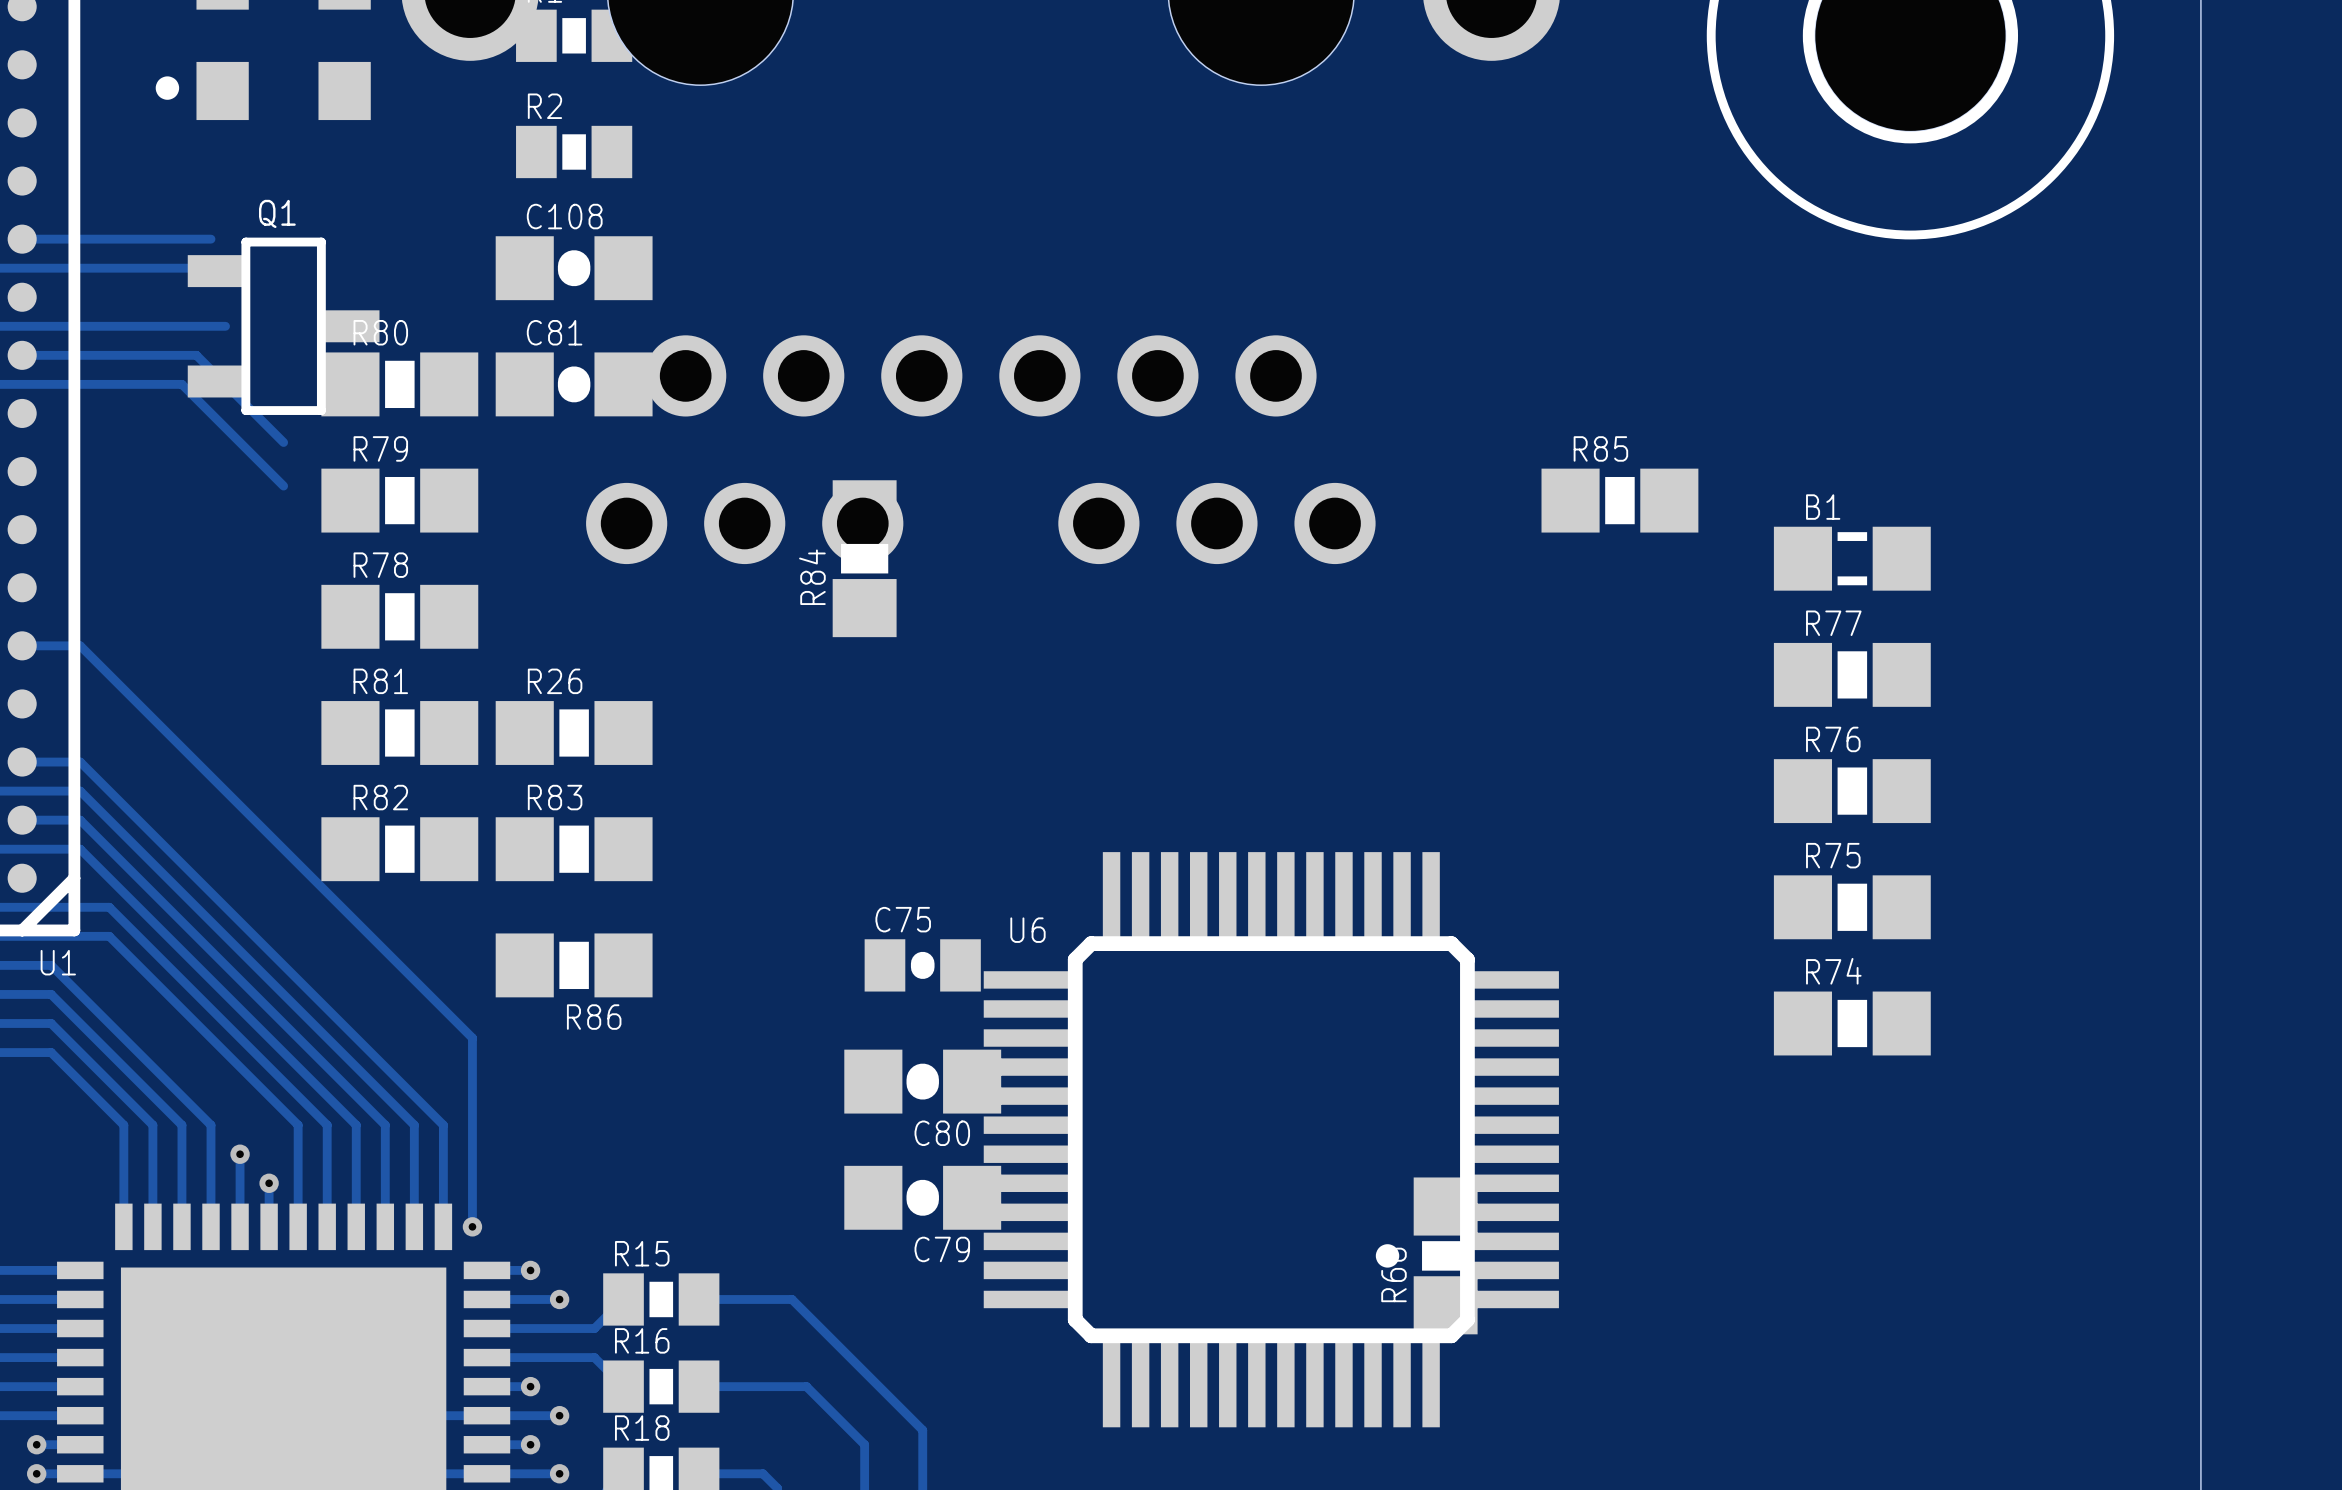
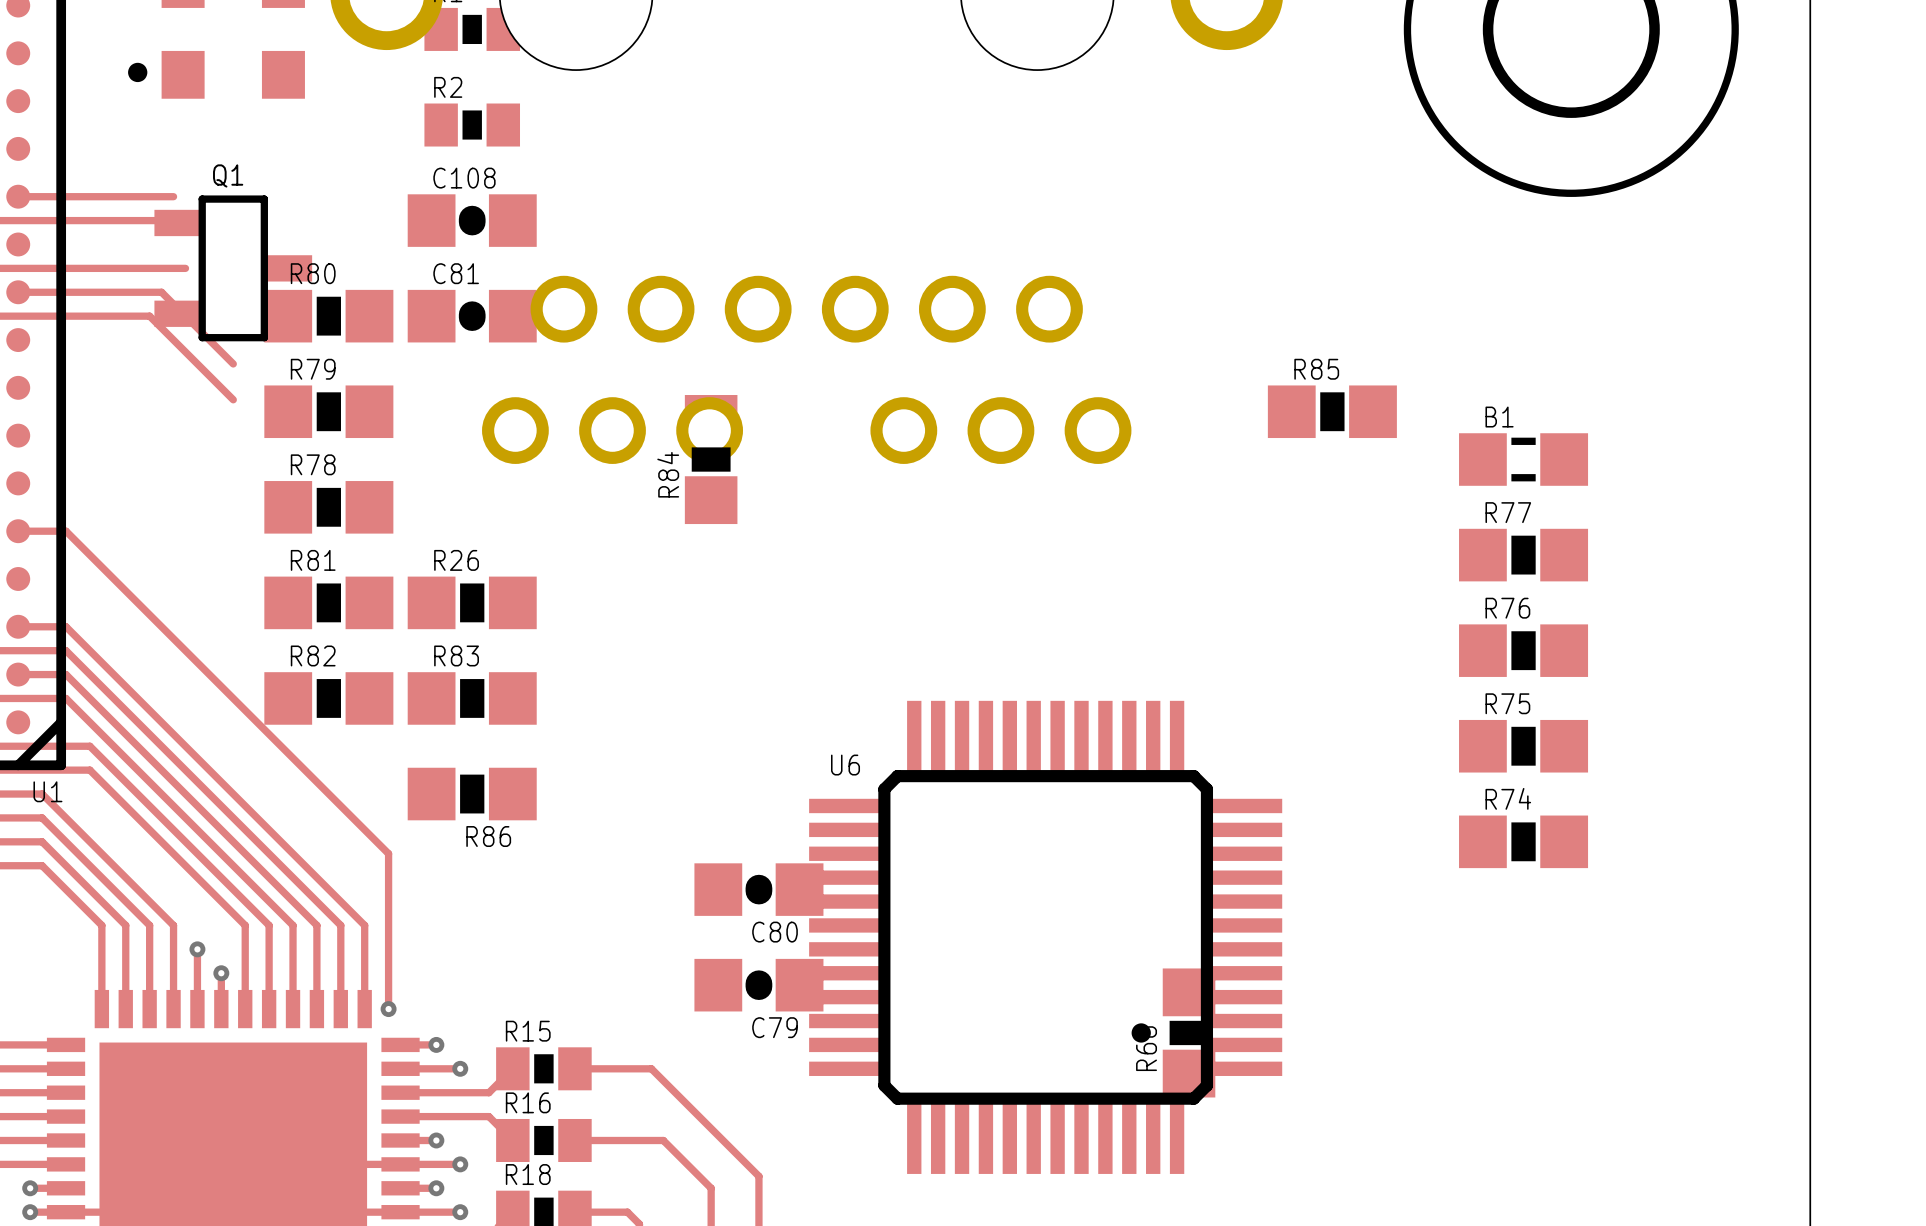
C75: (922, 965) -> none

